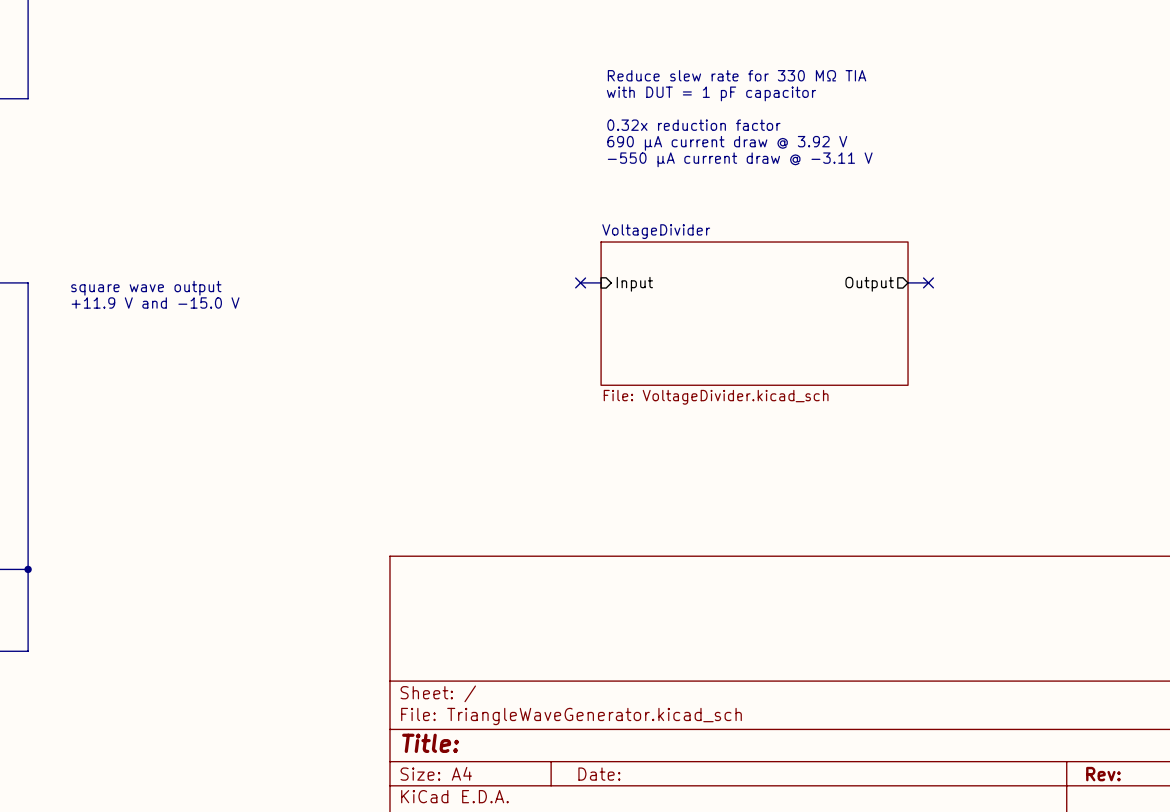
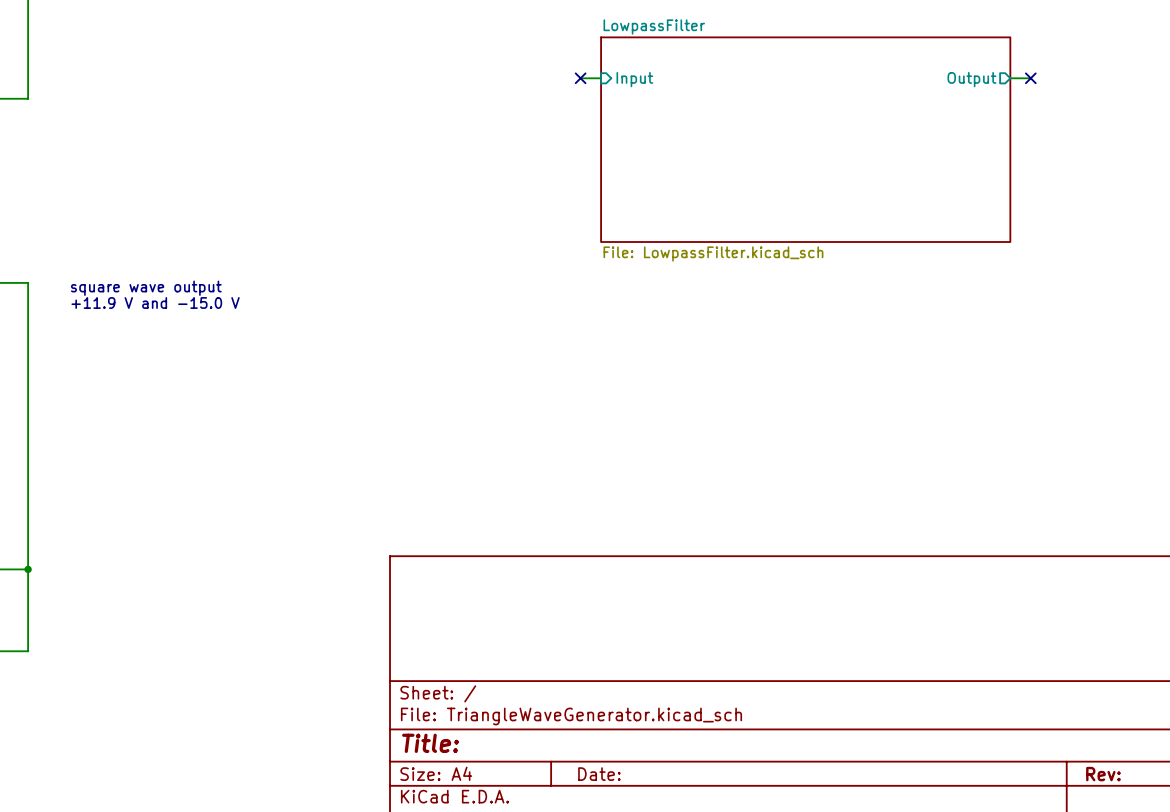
text: Reduce slew rate for 330 MΩ TIA (737, 75) -> none
wire: none -> (580, 78) (601, 78)
no-connect mark: none -> (580, 78)
wire: none -> (1010, 78) (1030, 78)
no-connect mark: none -> (1030, 78)
sheet pin: none -> Input (634, 79)
sheet pin: none -> Output (971, 79)
text: with DUT = 1 pF capacitor (711, 93) -> none
text: 0.32x reduction factor (693, 125) -> none
sheet LowpassFilter: none -> File: LowpassFilter.kicad_sch (805, 139)
text: 690 μA current draw @ 3.92 V (727, 143) -> none
text: -550 μA current draw @ -3.11 V (740, 159) -> none
wire: (580, 282) (601, 282) -> none
no-connect mark: (580, 282) -> none
wire: (908, 282) (928, 282) -> none
no-connect mark: (928, 282) -> none
sheet pin: Input (634, 284) -> none
sheet pin: Output (869, 284) -> none
sheet VoltageDivider: File: VoltageDivider.kicad_sch (754, 313) -> none

